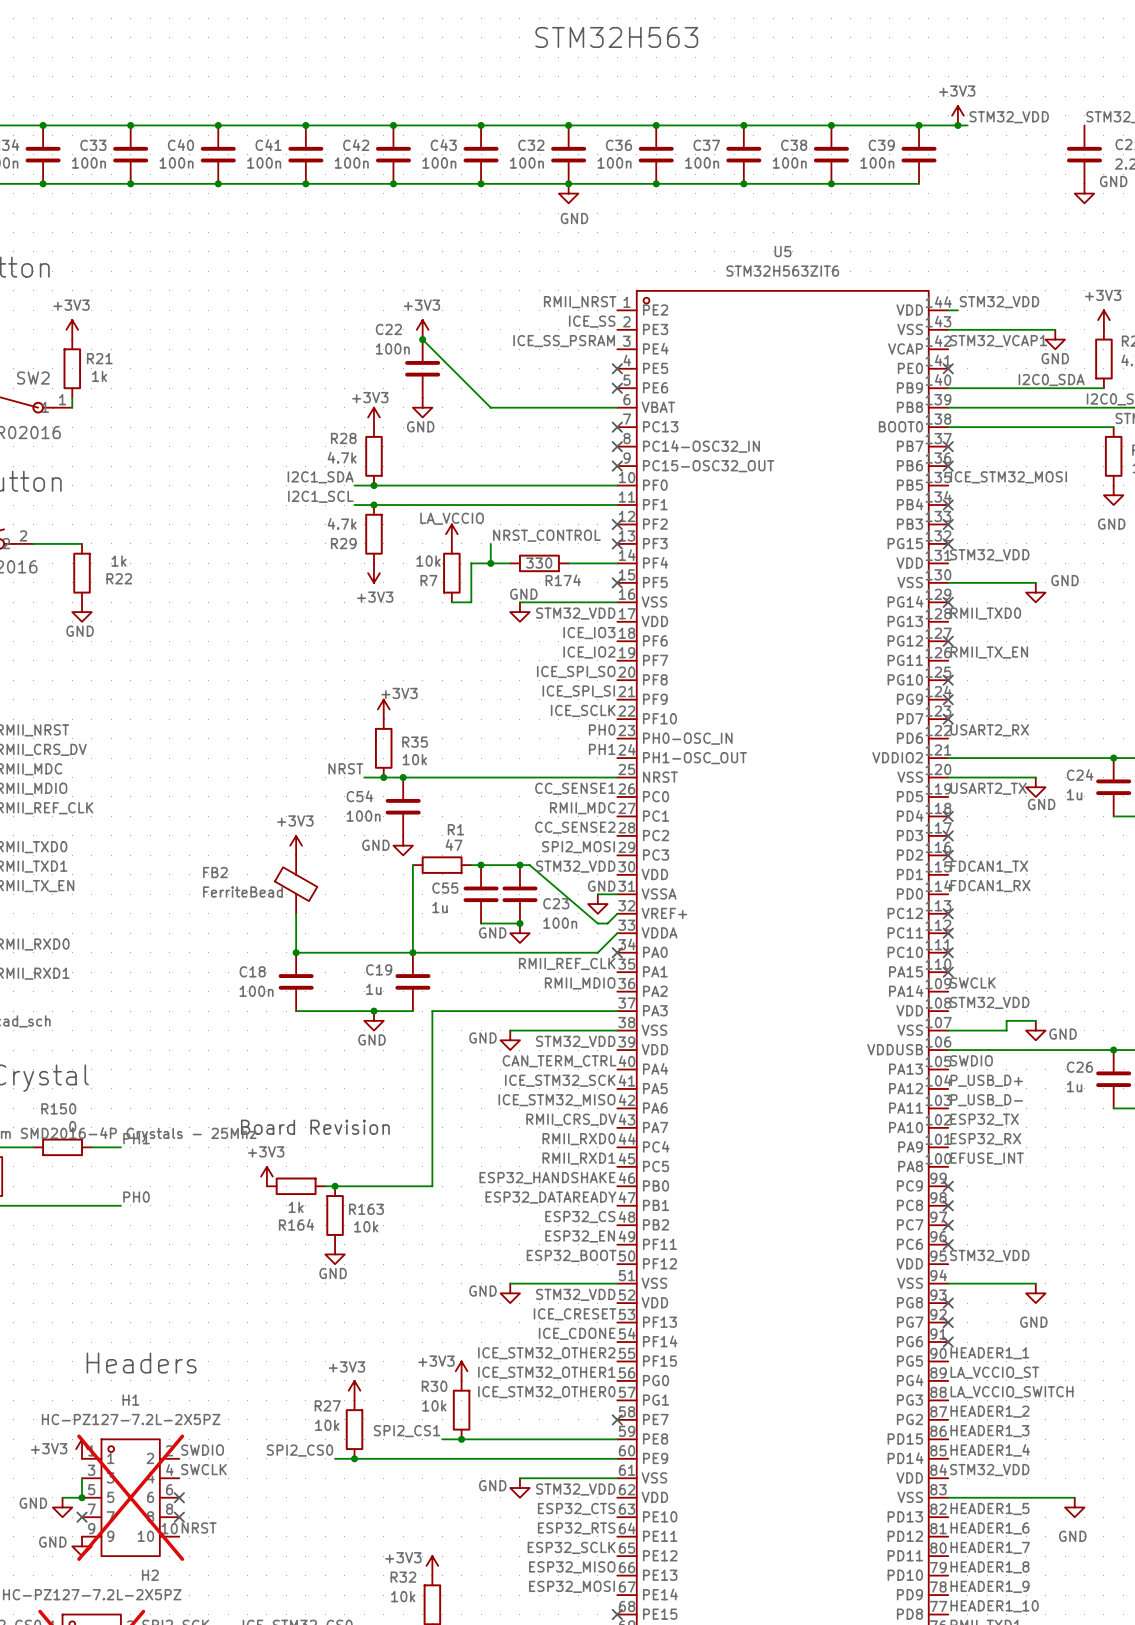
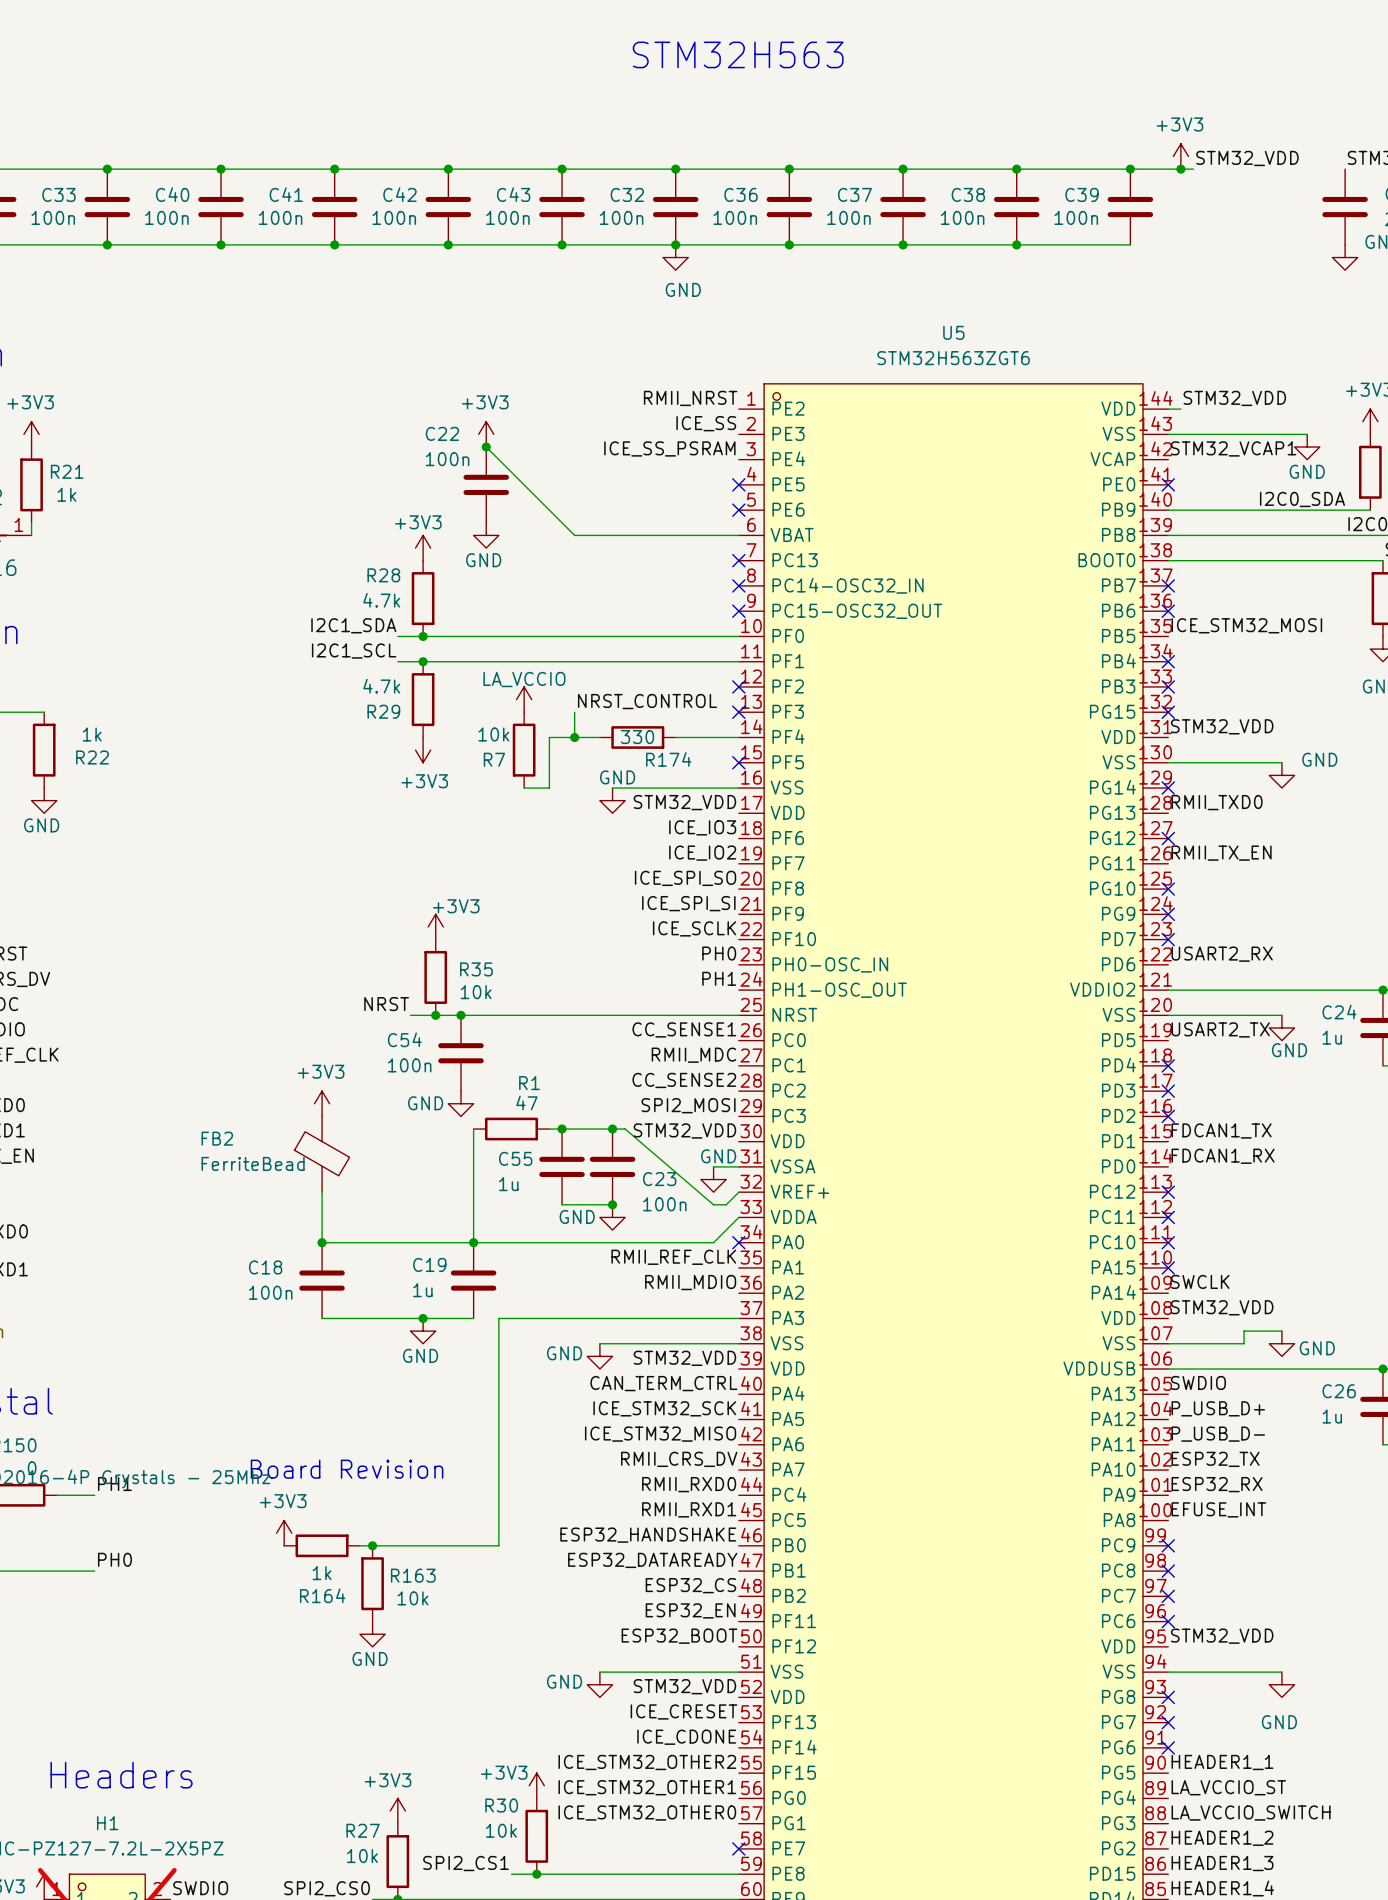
U5 value: STM32H563ZIT6 (782, 271) -> STM32H563ZGT6 (953, 358)

